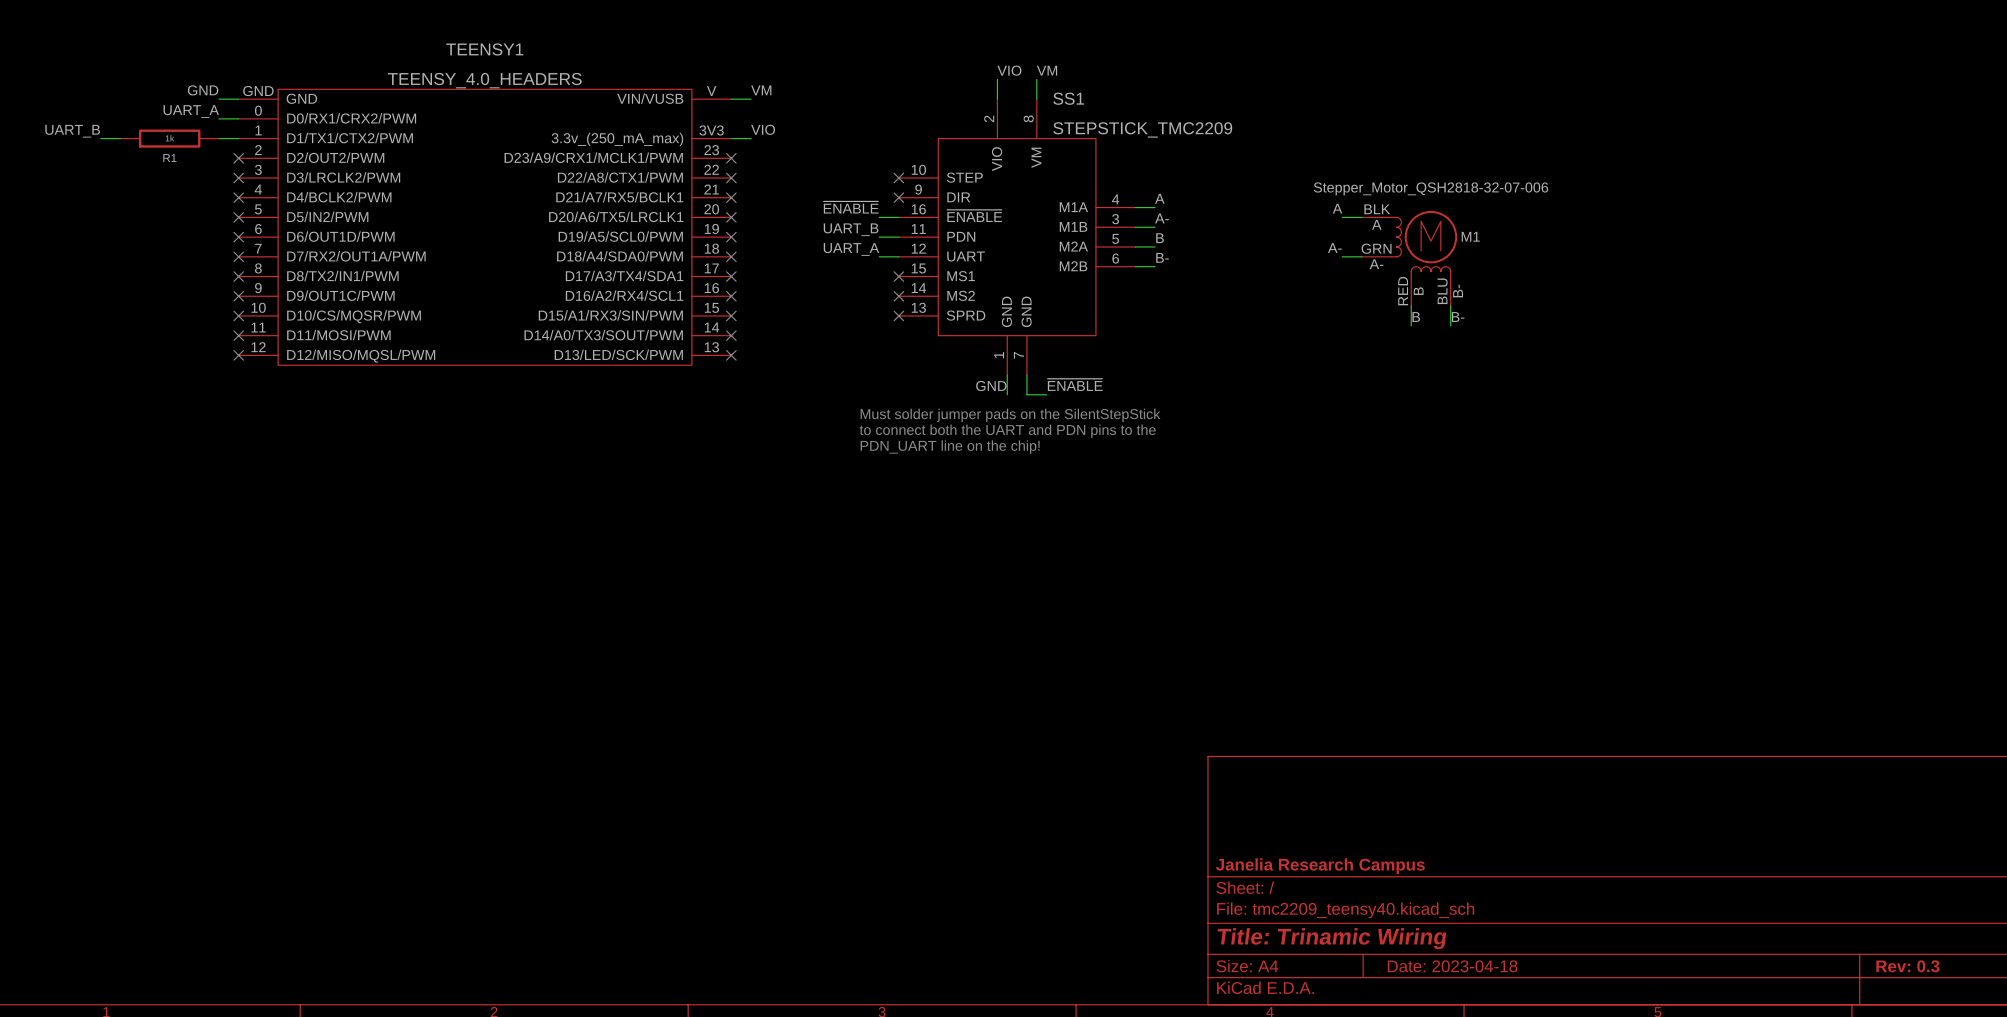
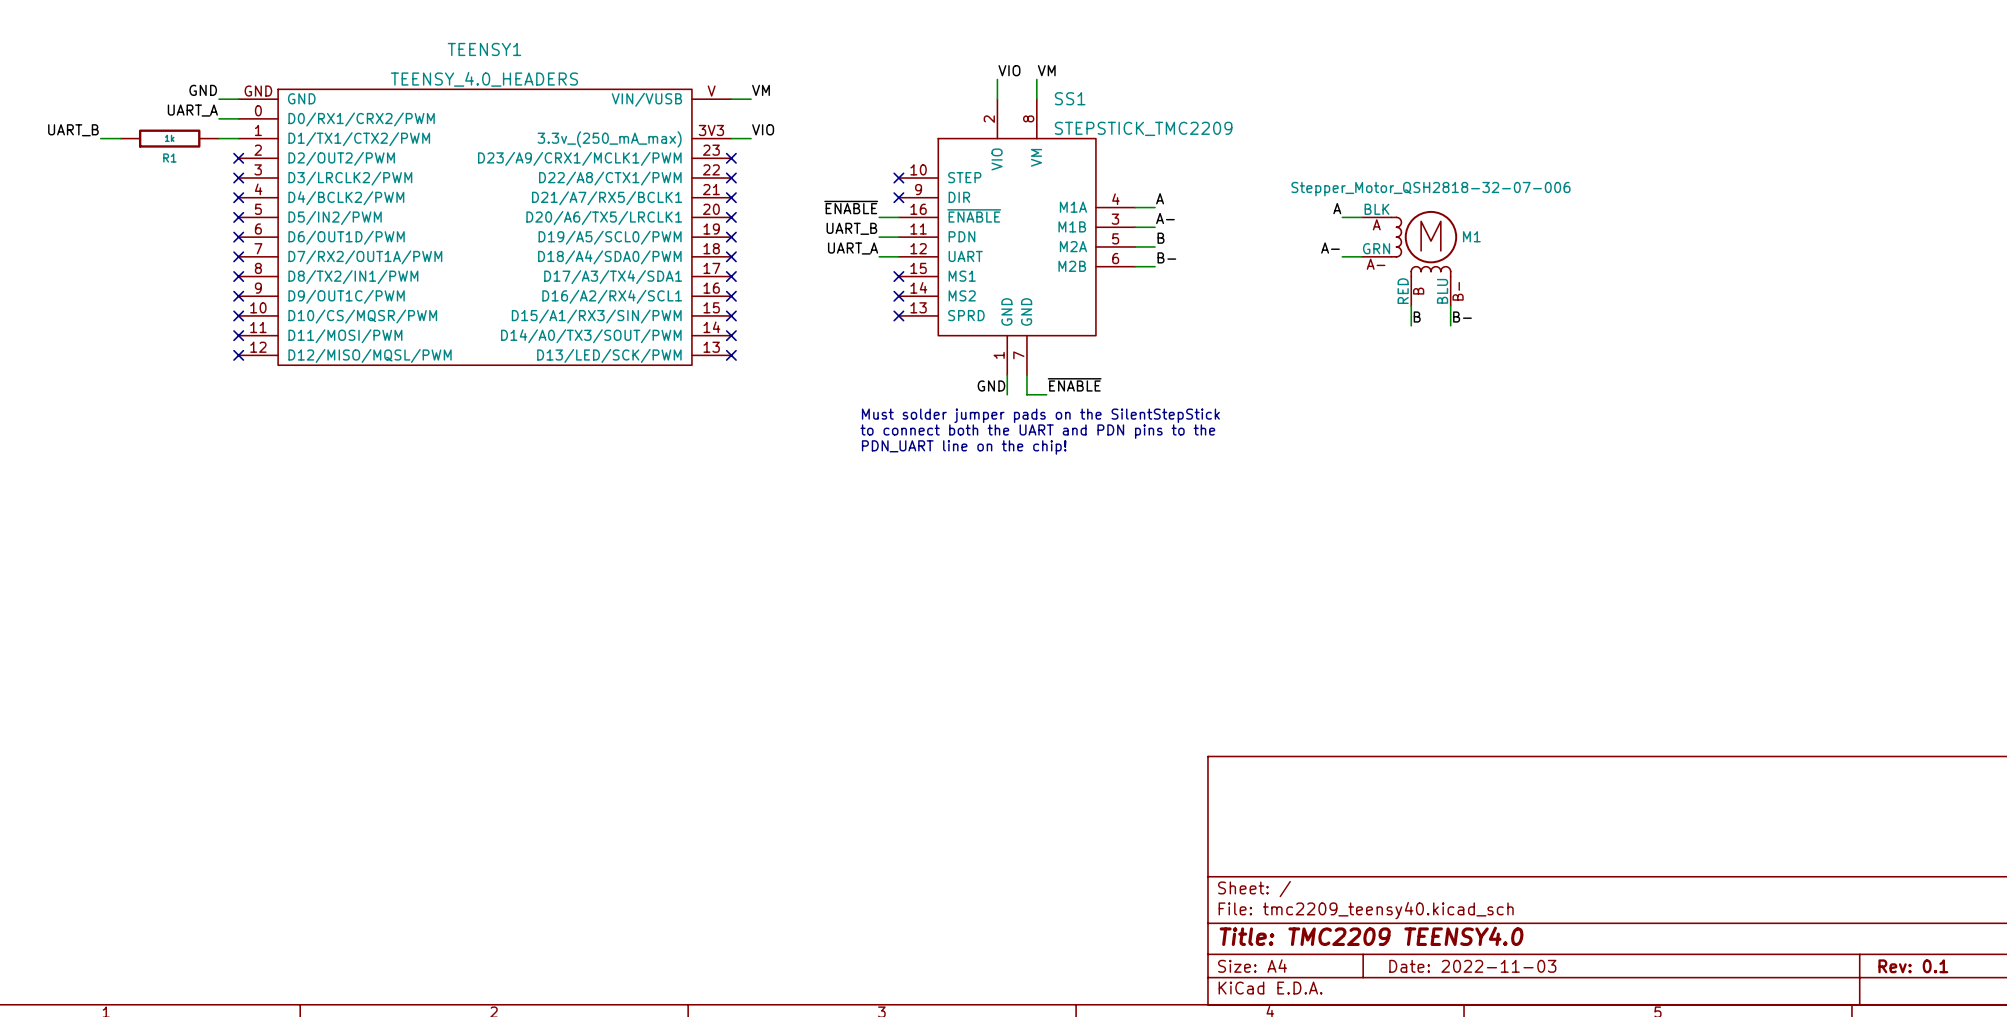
title block: Janelia Research Campus (1320, 866) -> none
title block: Title: Trinamic Wiring (1331, 938) -> Title: TMC2209 TEENSY4.0 (1371, 936)
title block: Date: 2023-04-18 (1452, 966) -> Date: 2022-11-03 (1472, 966)
title block: Rev: 0.3 (1907, 966) -> Rev: 0.1 (1913, 966)

